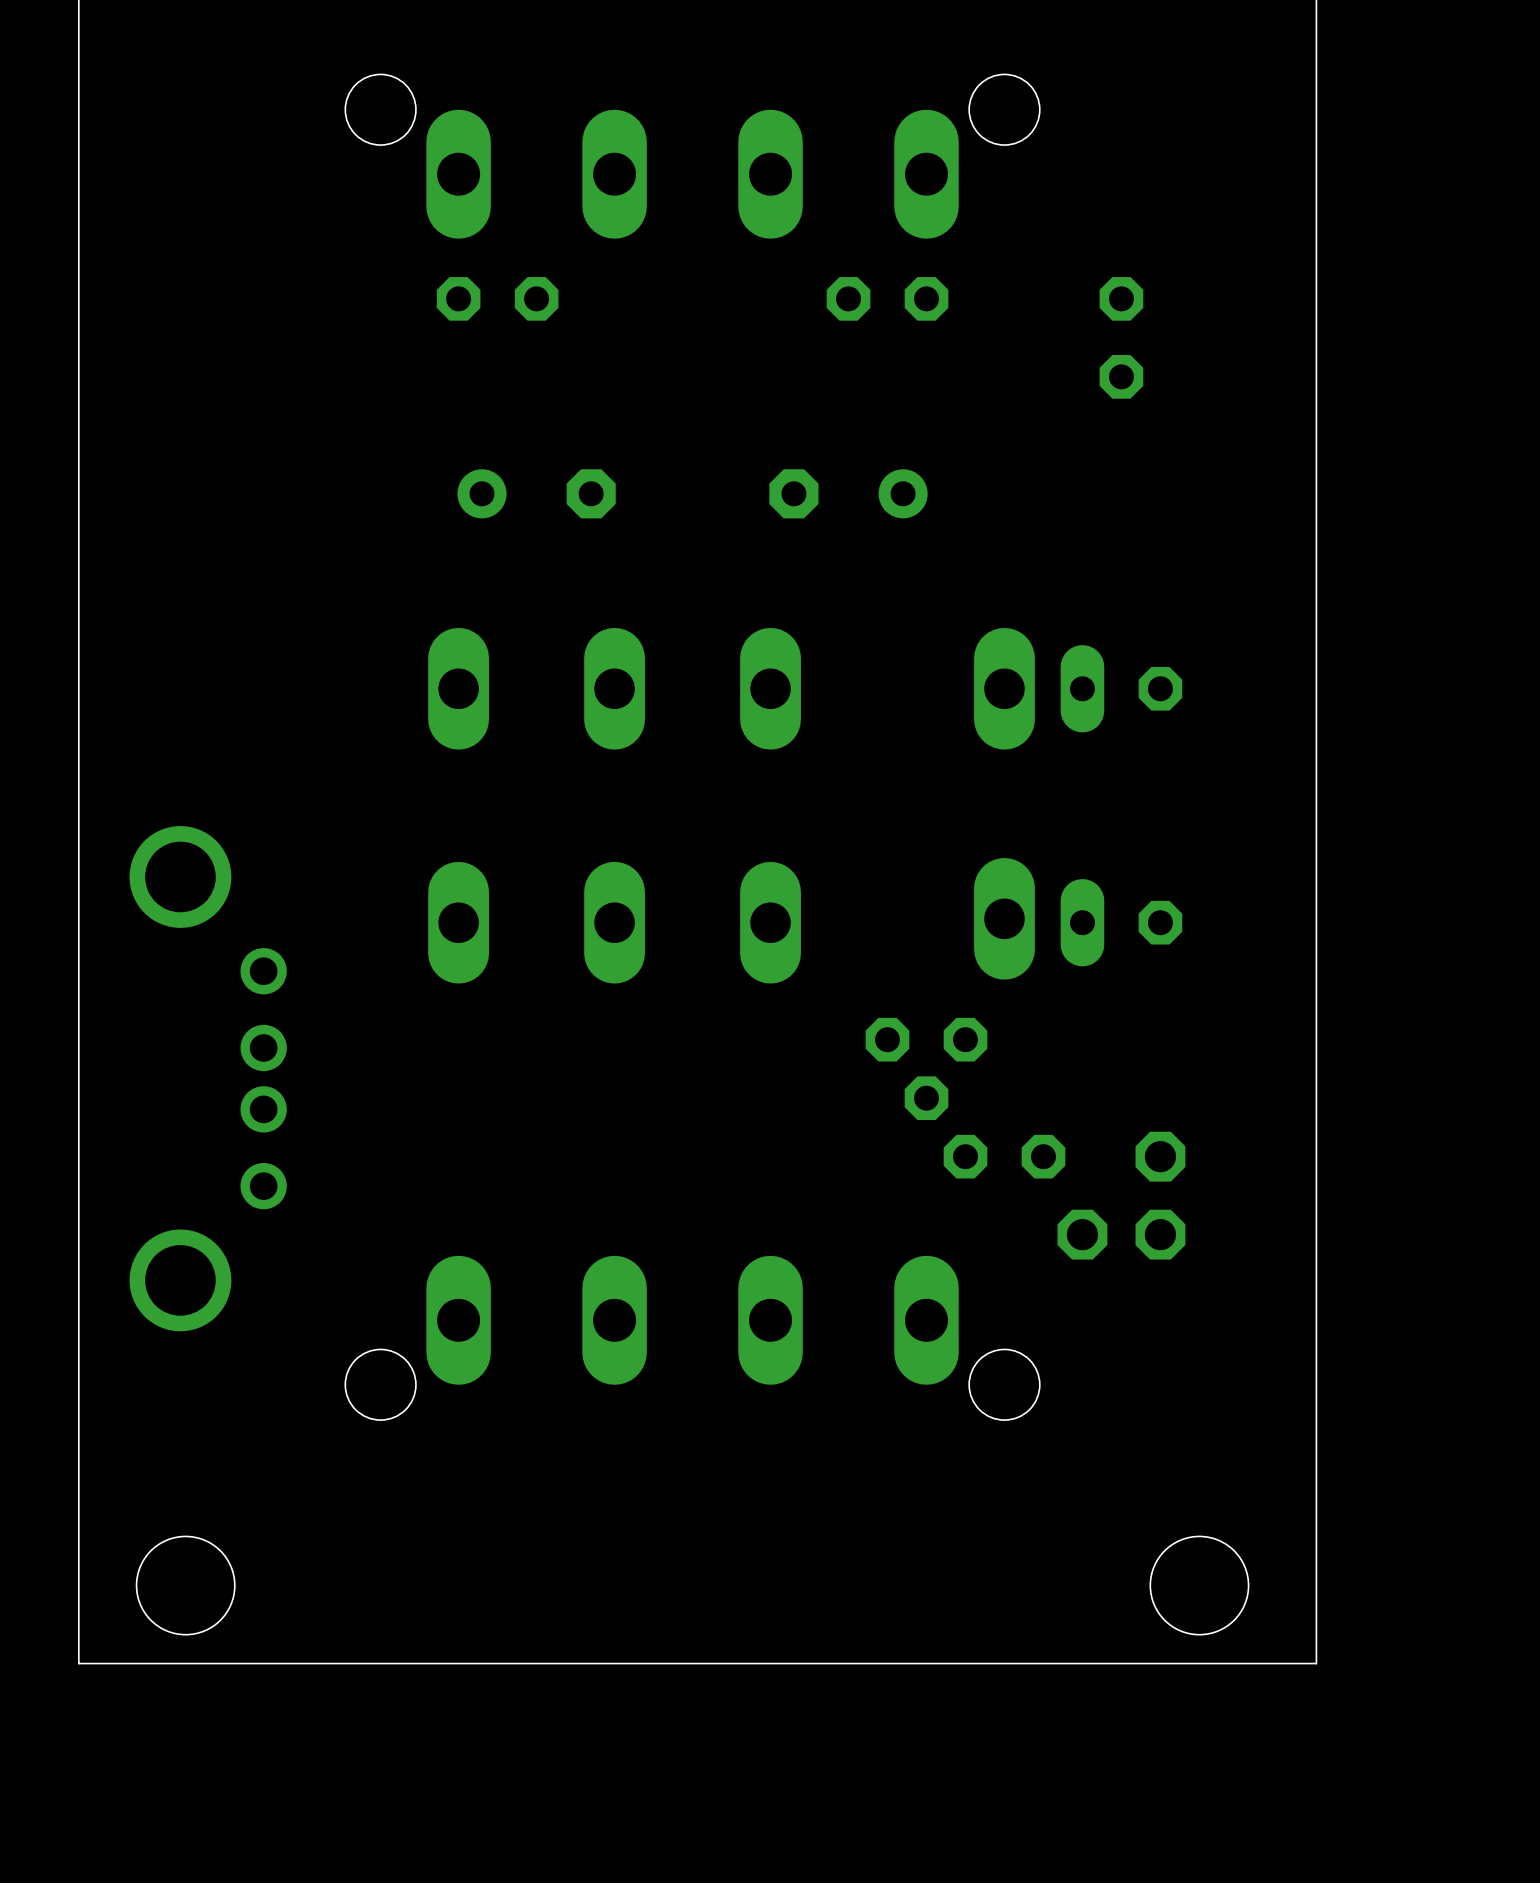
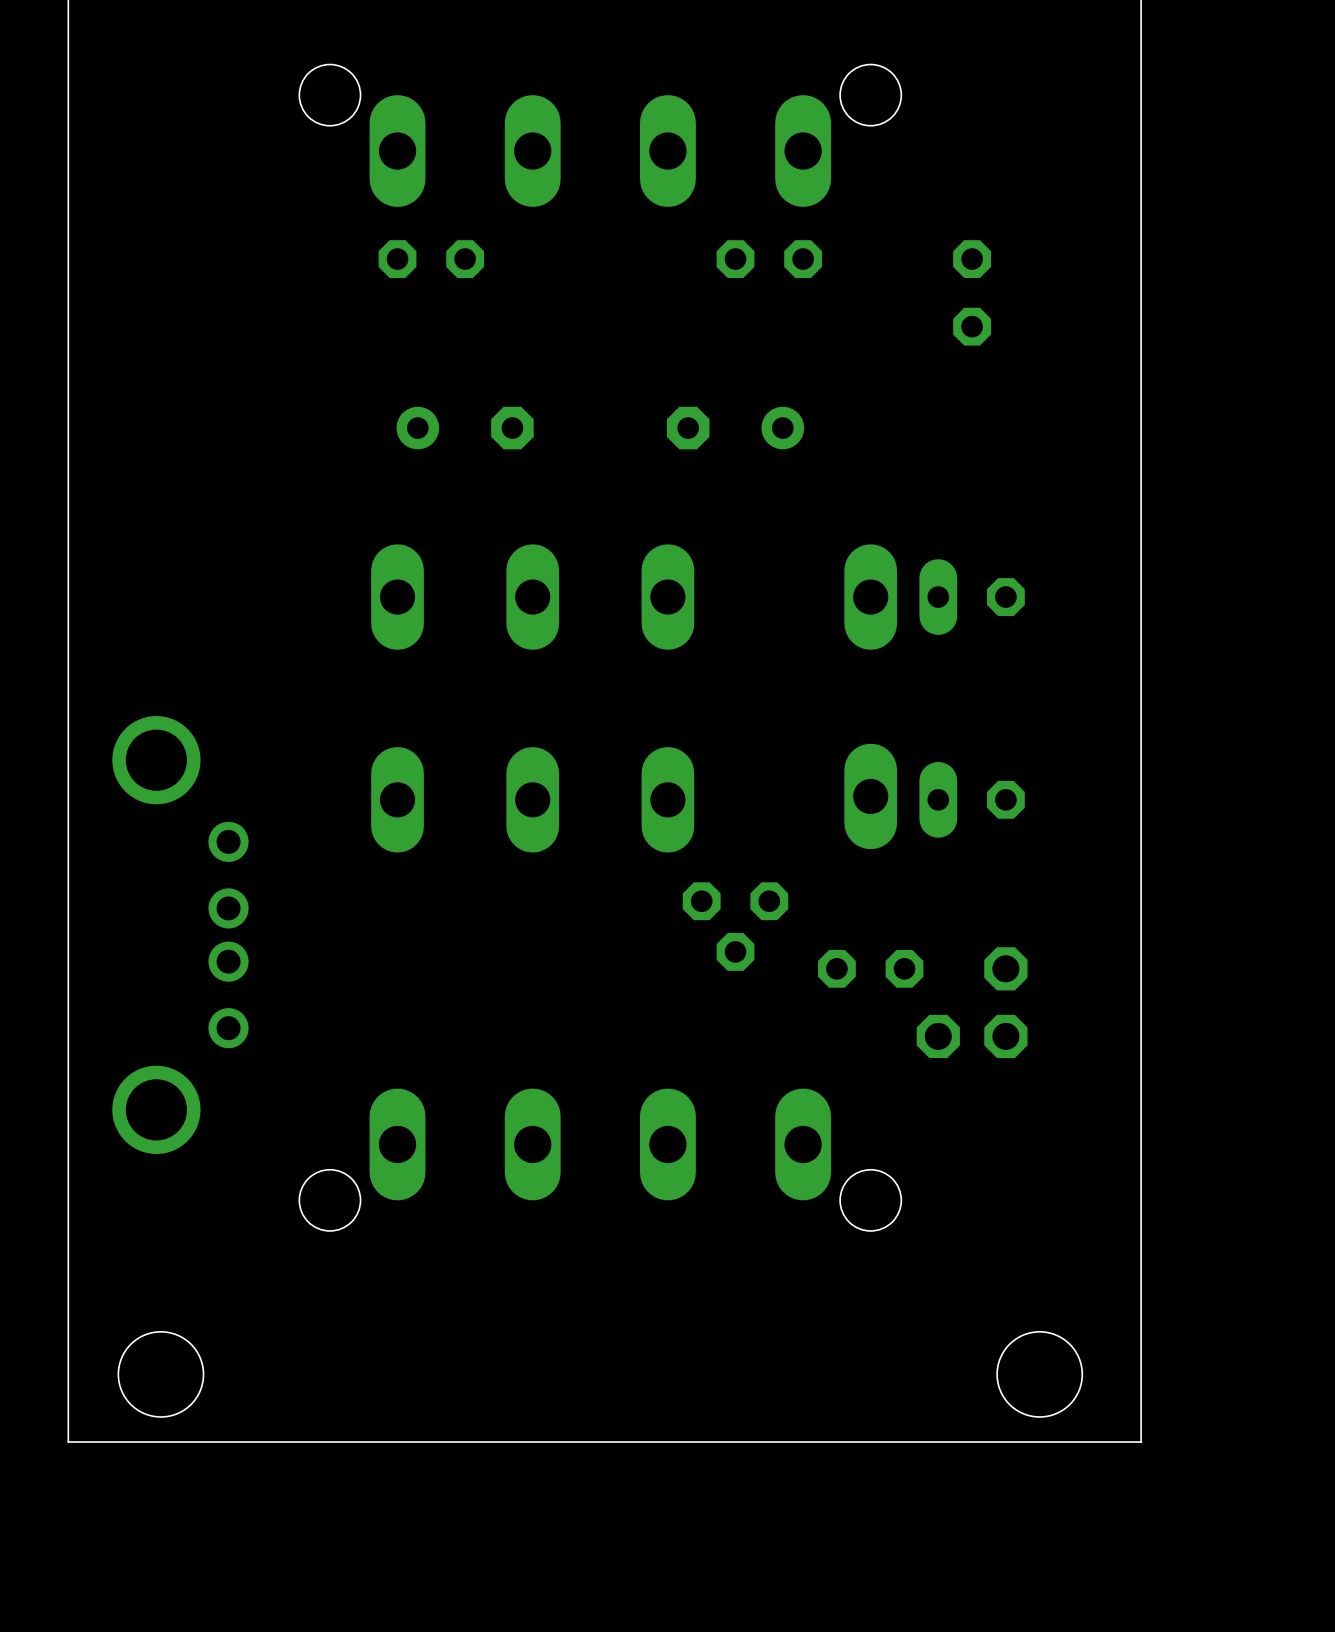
part position: (926, 1068) -> (735, 926)
part: none -> (1005, 968)
part position: (1004, 1156) -> (870, 968)
part: (1160, 1156) -> none
part: none -> (1005, 1036)
part position: (1082, 1234) -> (938, 1036)
part: (1160, 1234) -> none

